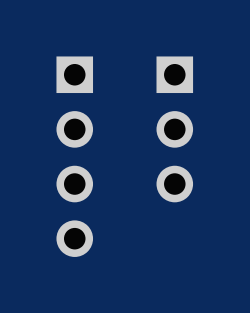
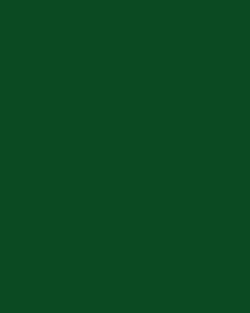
part: (174, 129) -> none
part: (74, 156) -> none

